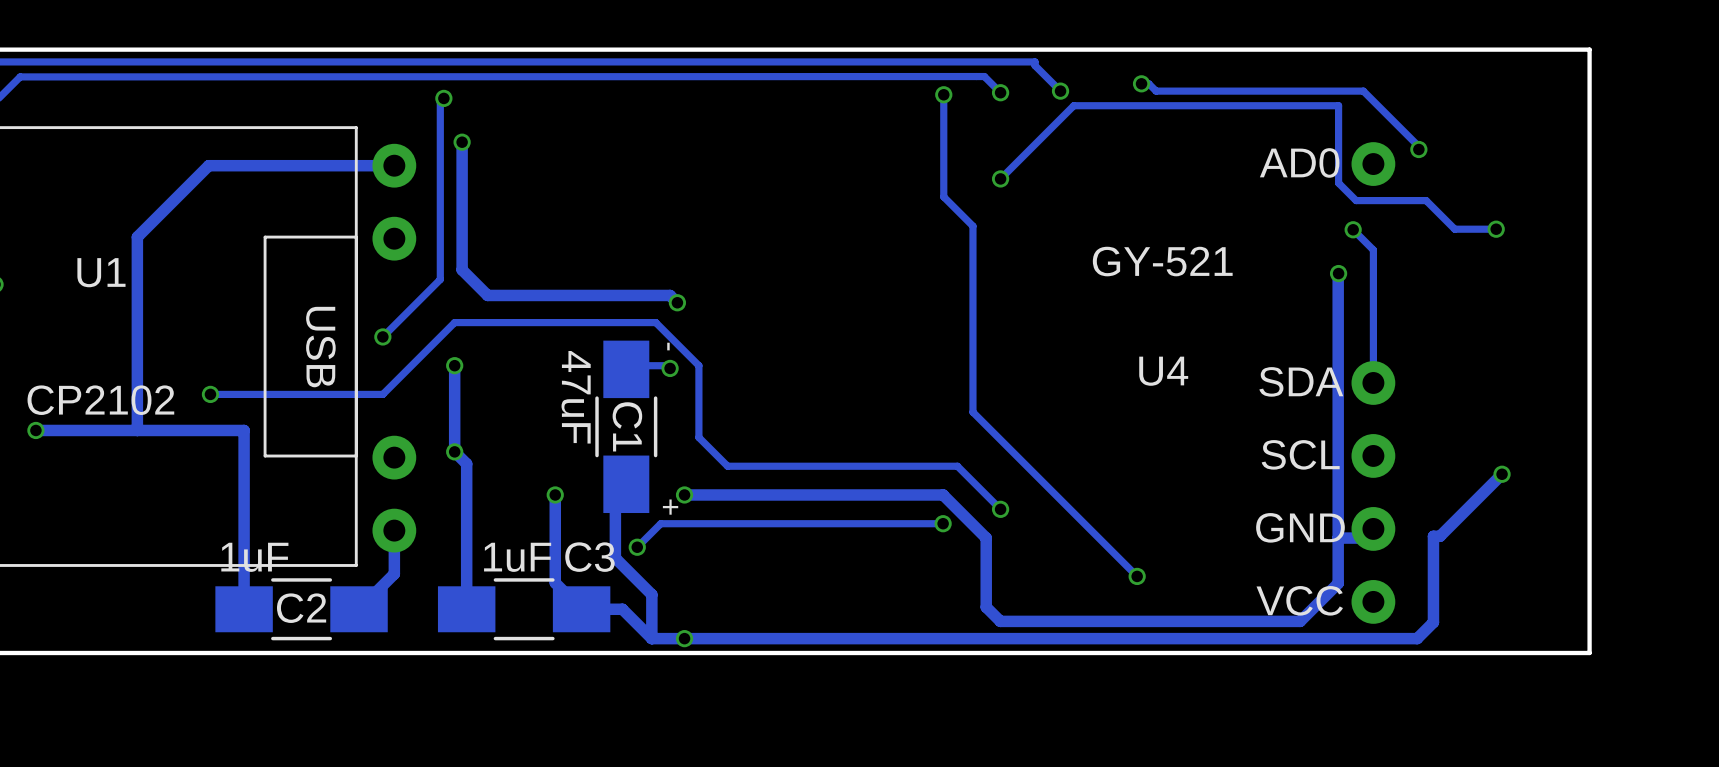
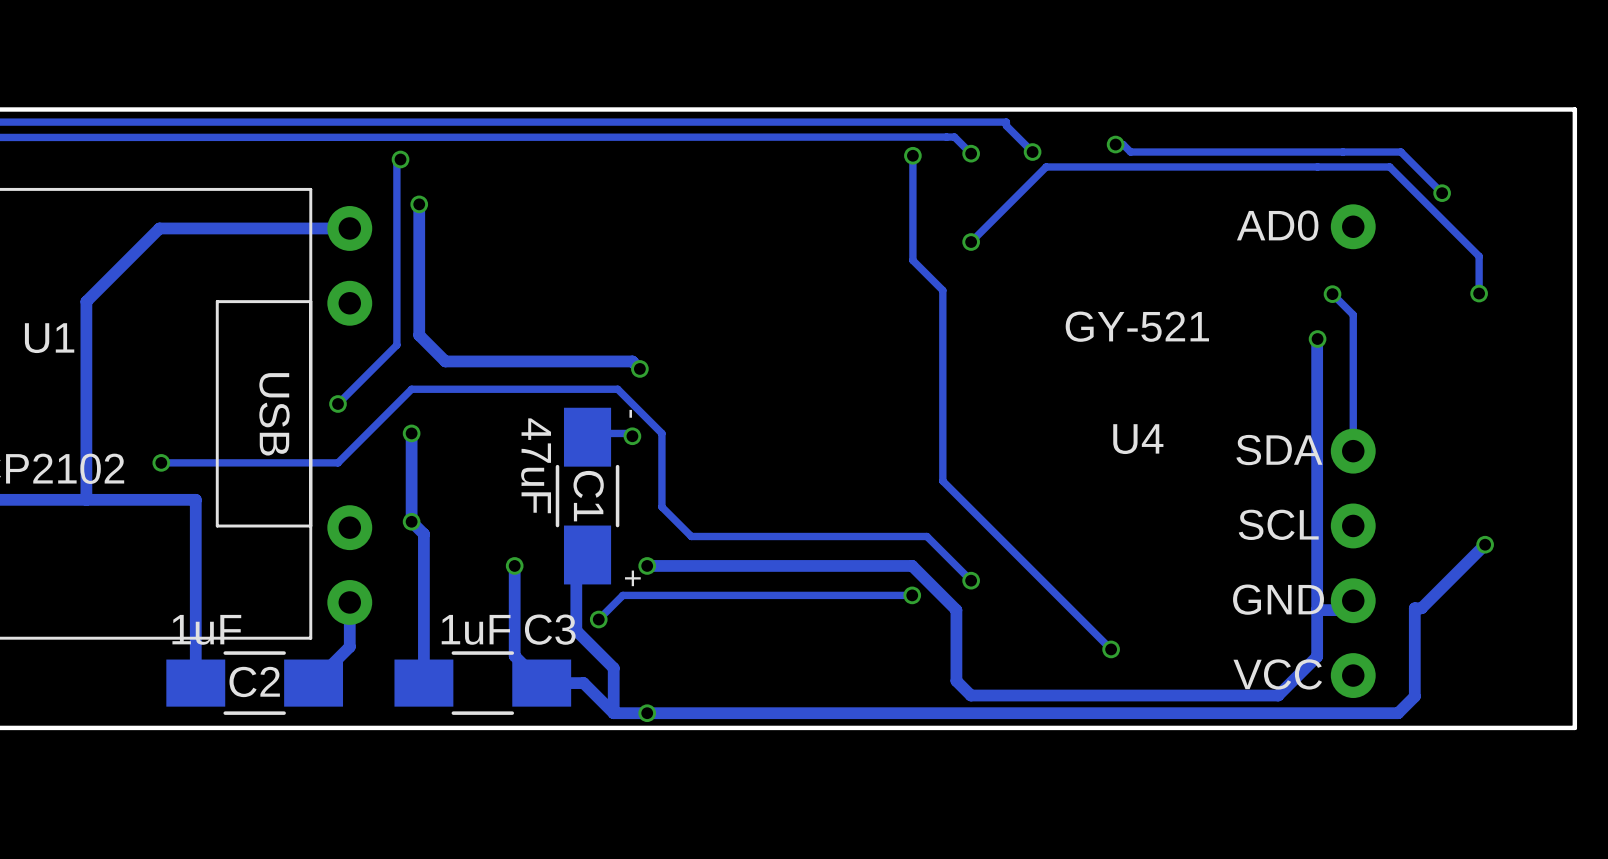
track: (1363, 91) (1418, 146) (1418, 149) -> (1343, 152) (1400, 152) (1442, 193)
track: (1338, 105) (1338, 183) (1356, 200) (1426, 200) (1454, 229) (1496, 229) -> (1317, 166) (1389, 166) (1479, 256) (1479, 293)
via position: (1418, 149) -> (1442, 193)

